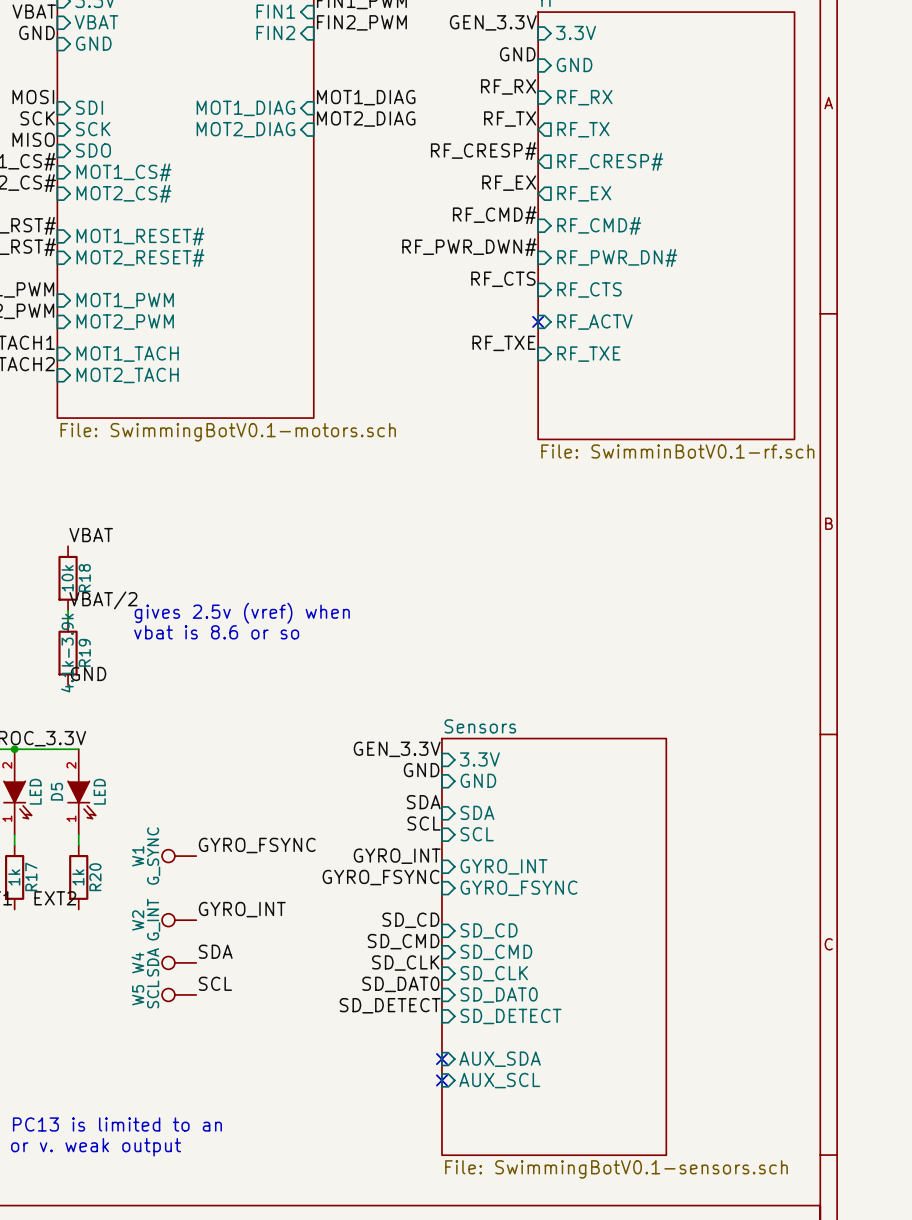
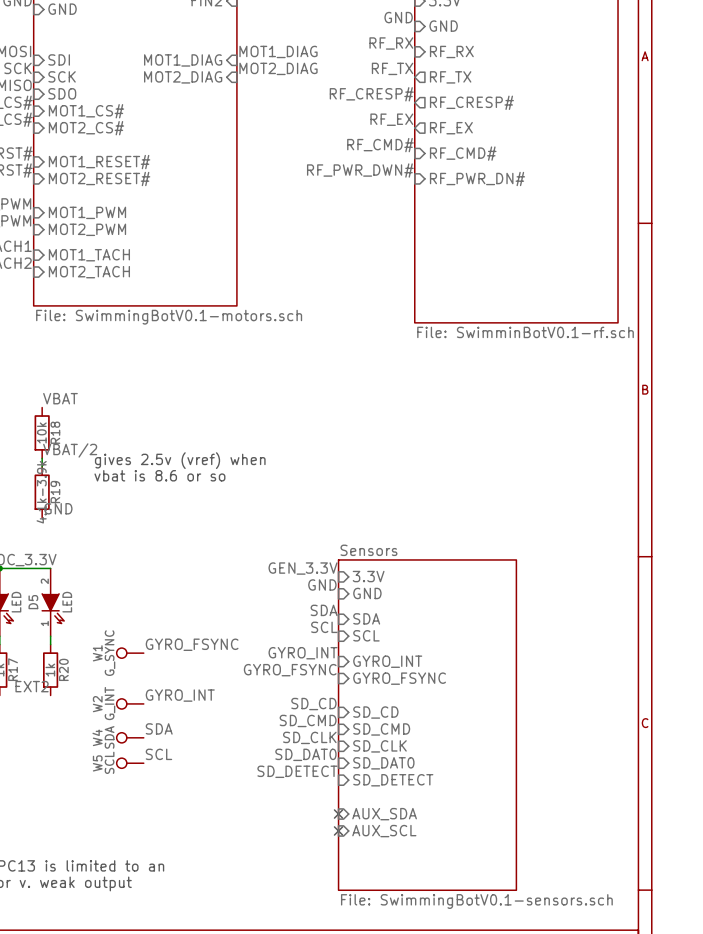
label: RF_CTS (503, 279) -> none
sheet pin: RF_CTS (589, 289) -> none
no-connect mark: (538, 321) -> none
sheet pin: RF_ACTV (594, 322) -> none
label: RF_TXE (504, 343) -> none
sheet pin: RF_TXE (588, 354) -> none

